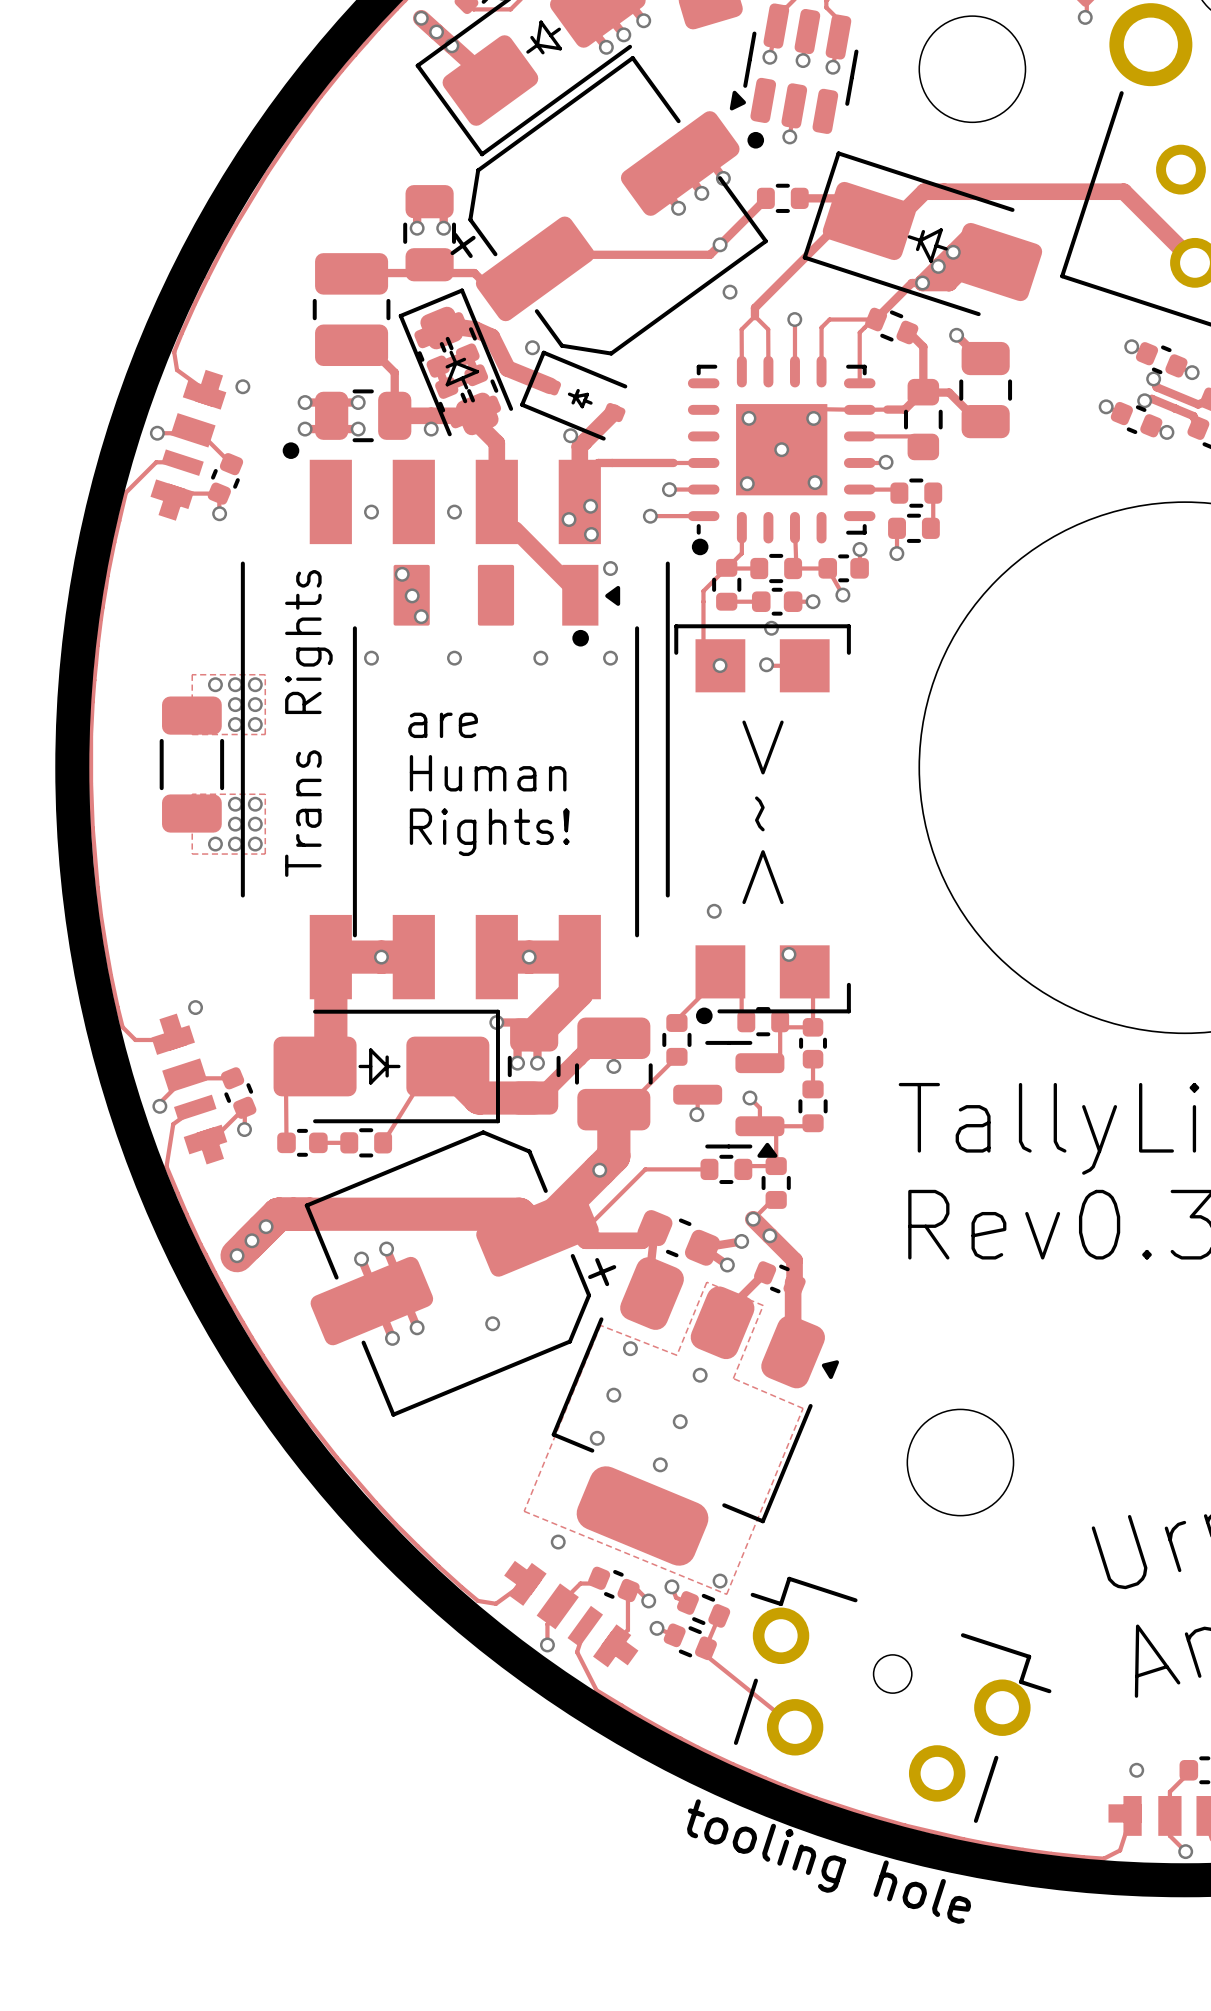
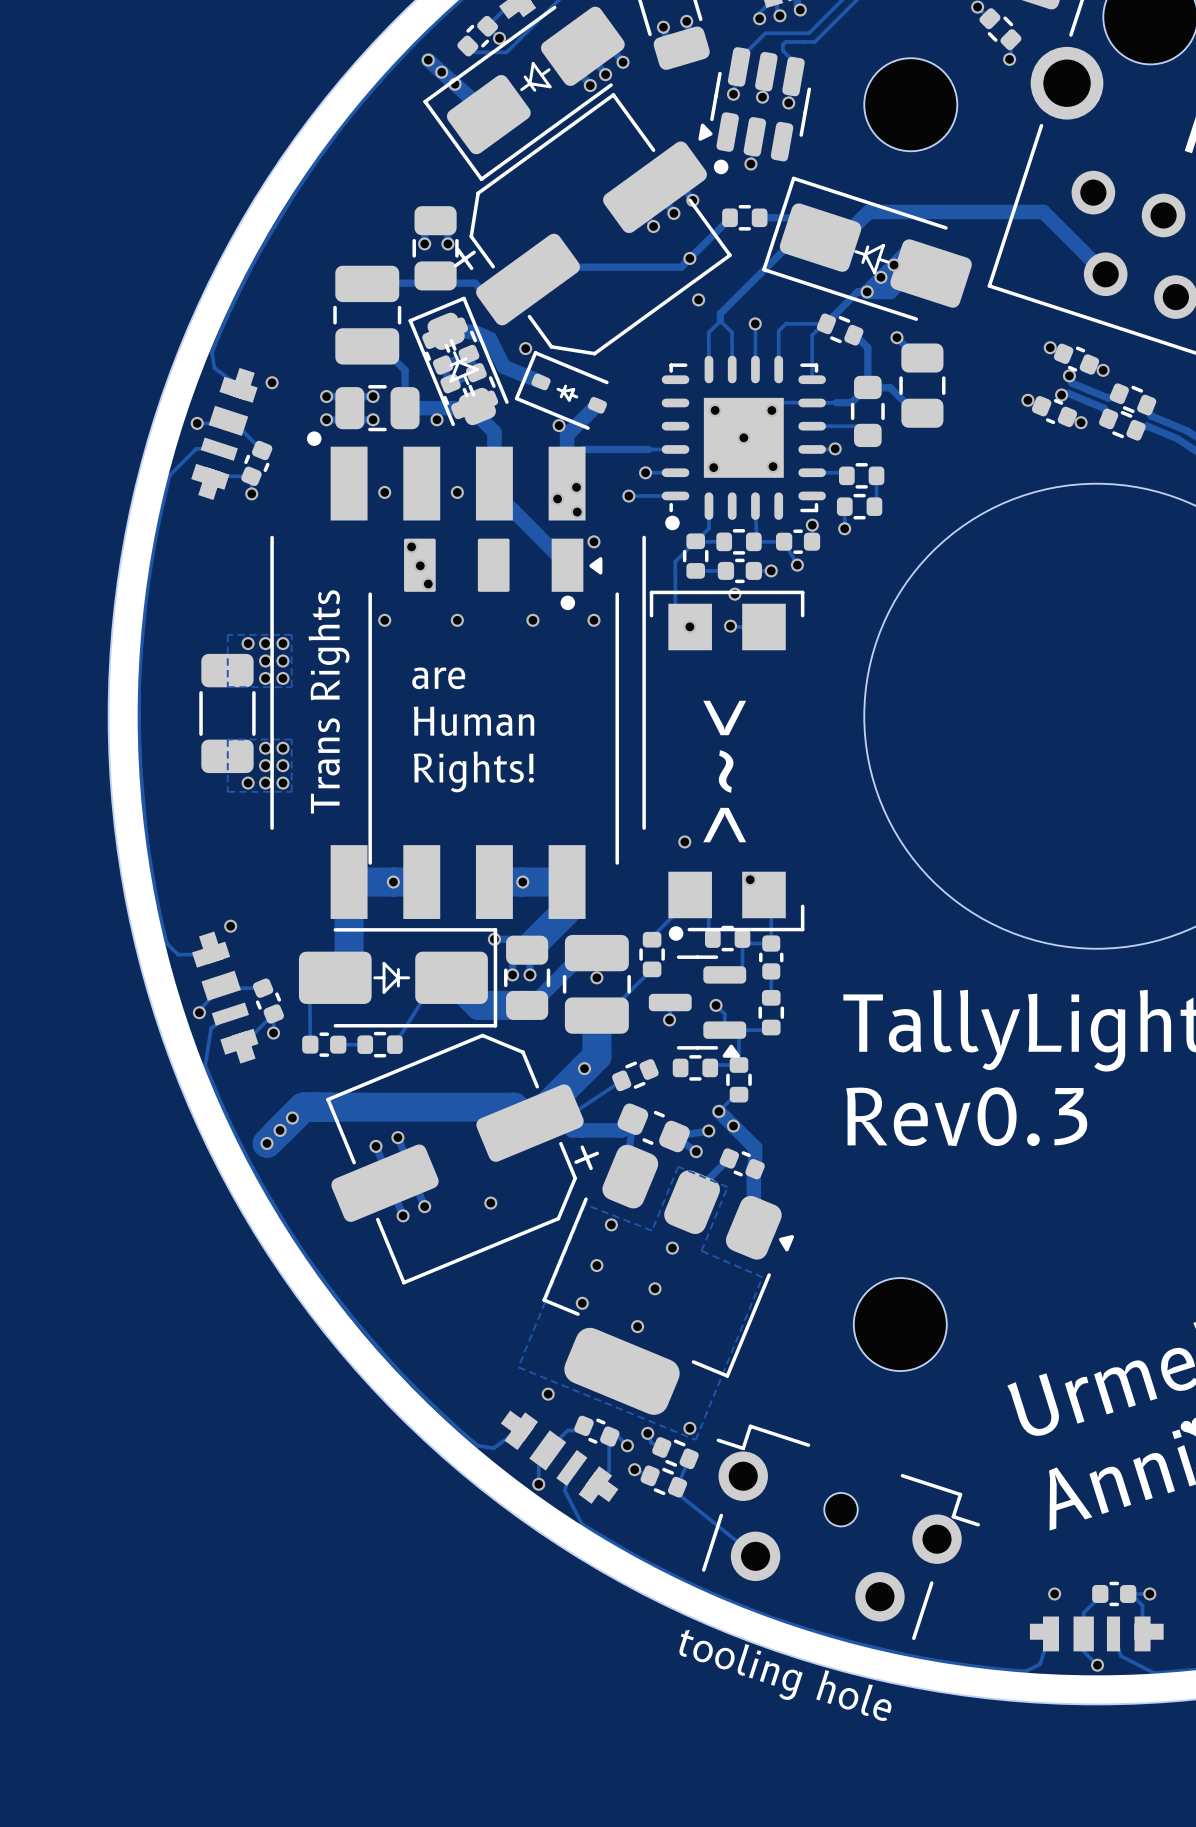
track: (709, 1169) (645, 1169) (584, 1229) -> none
part: none -> (635, 1075)
track: none -> (621, 1080) (567, 1117)

